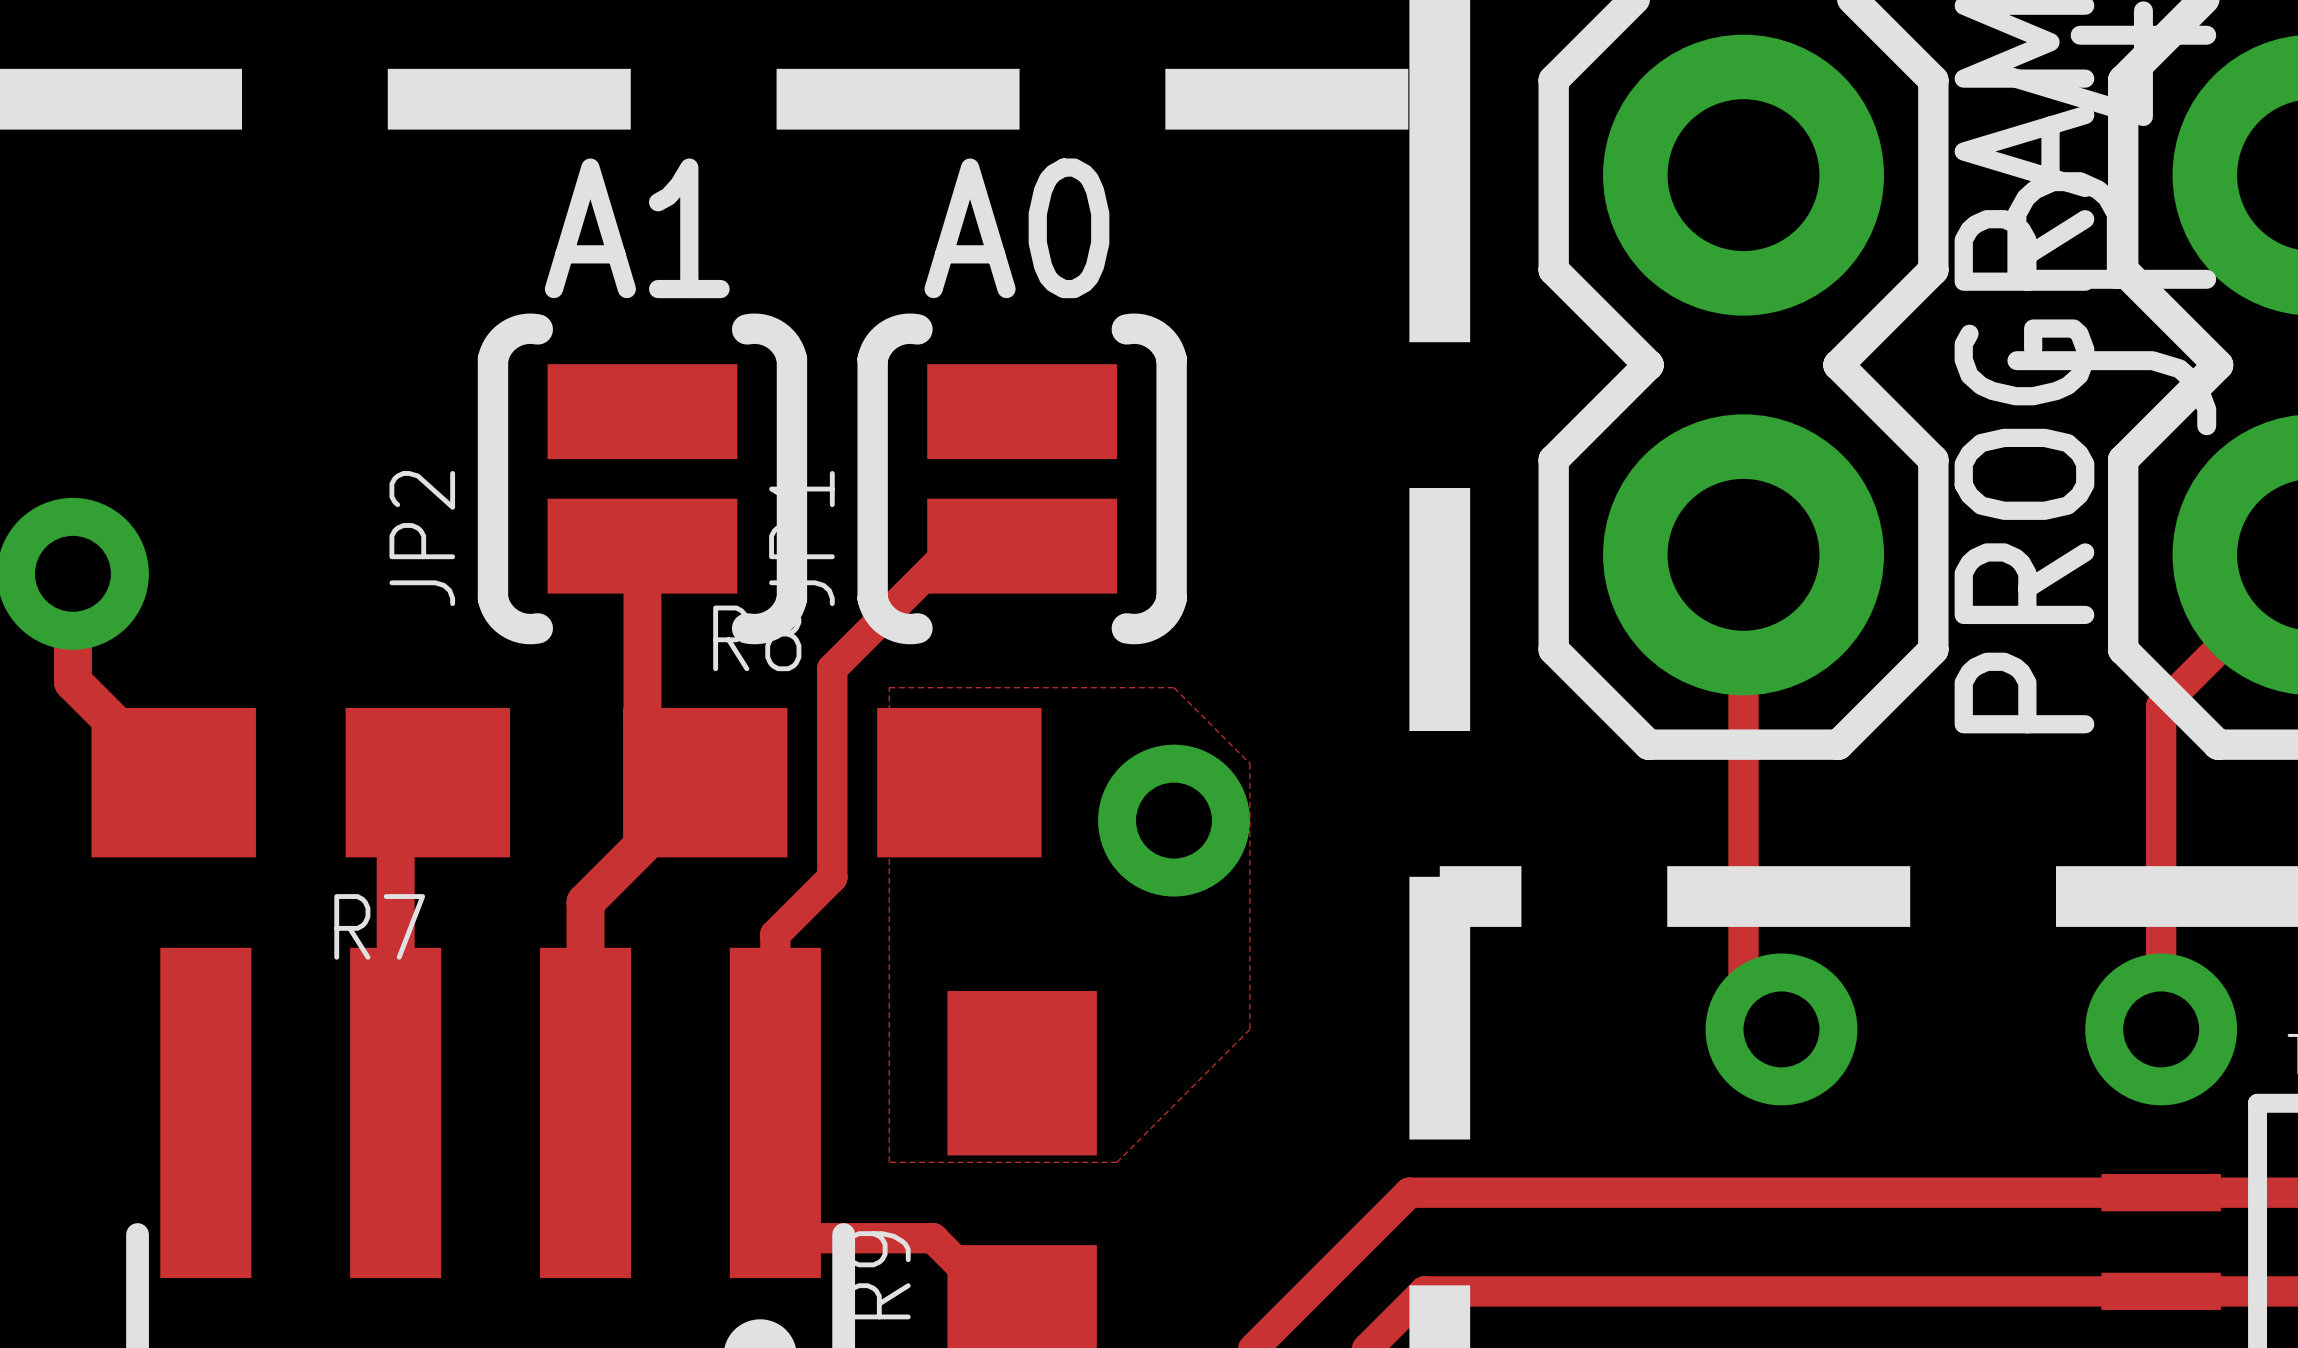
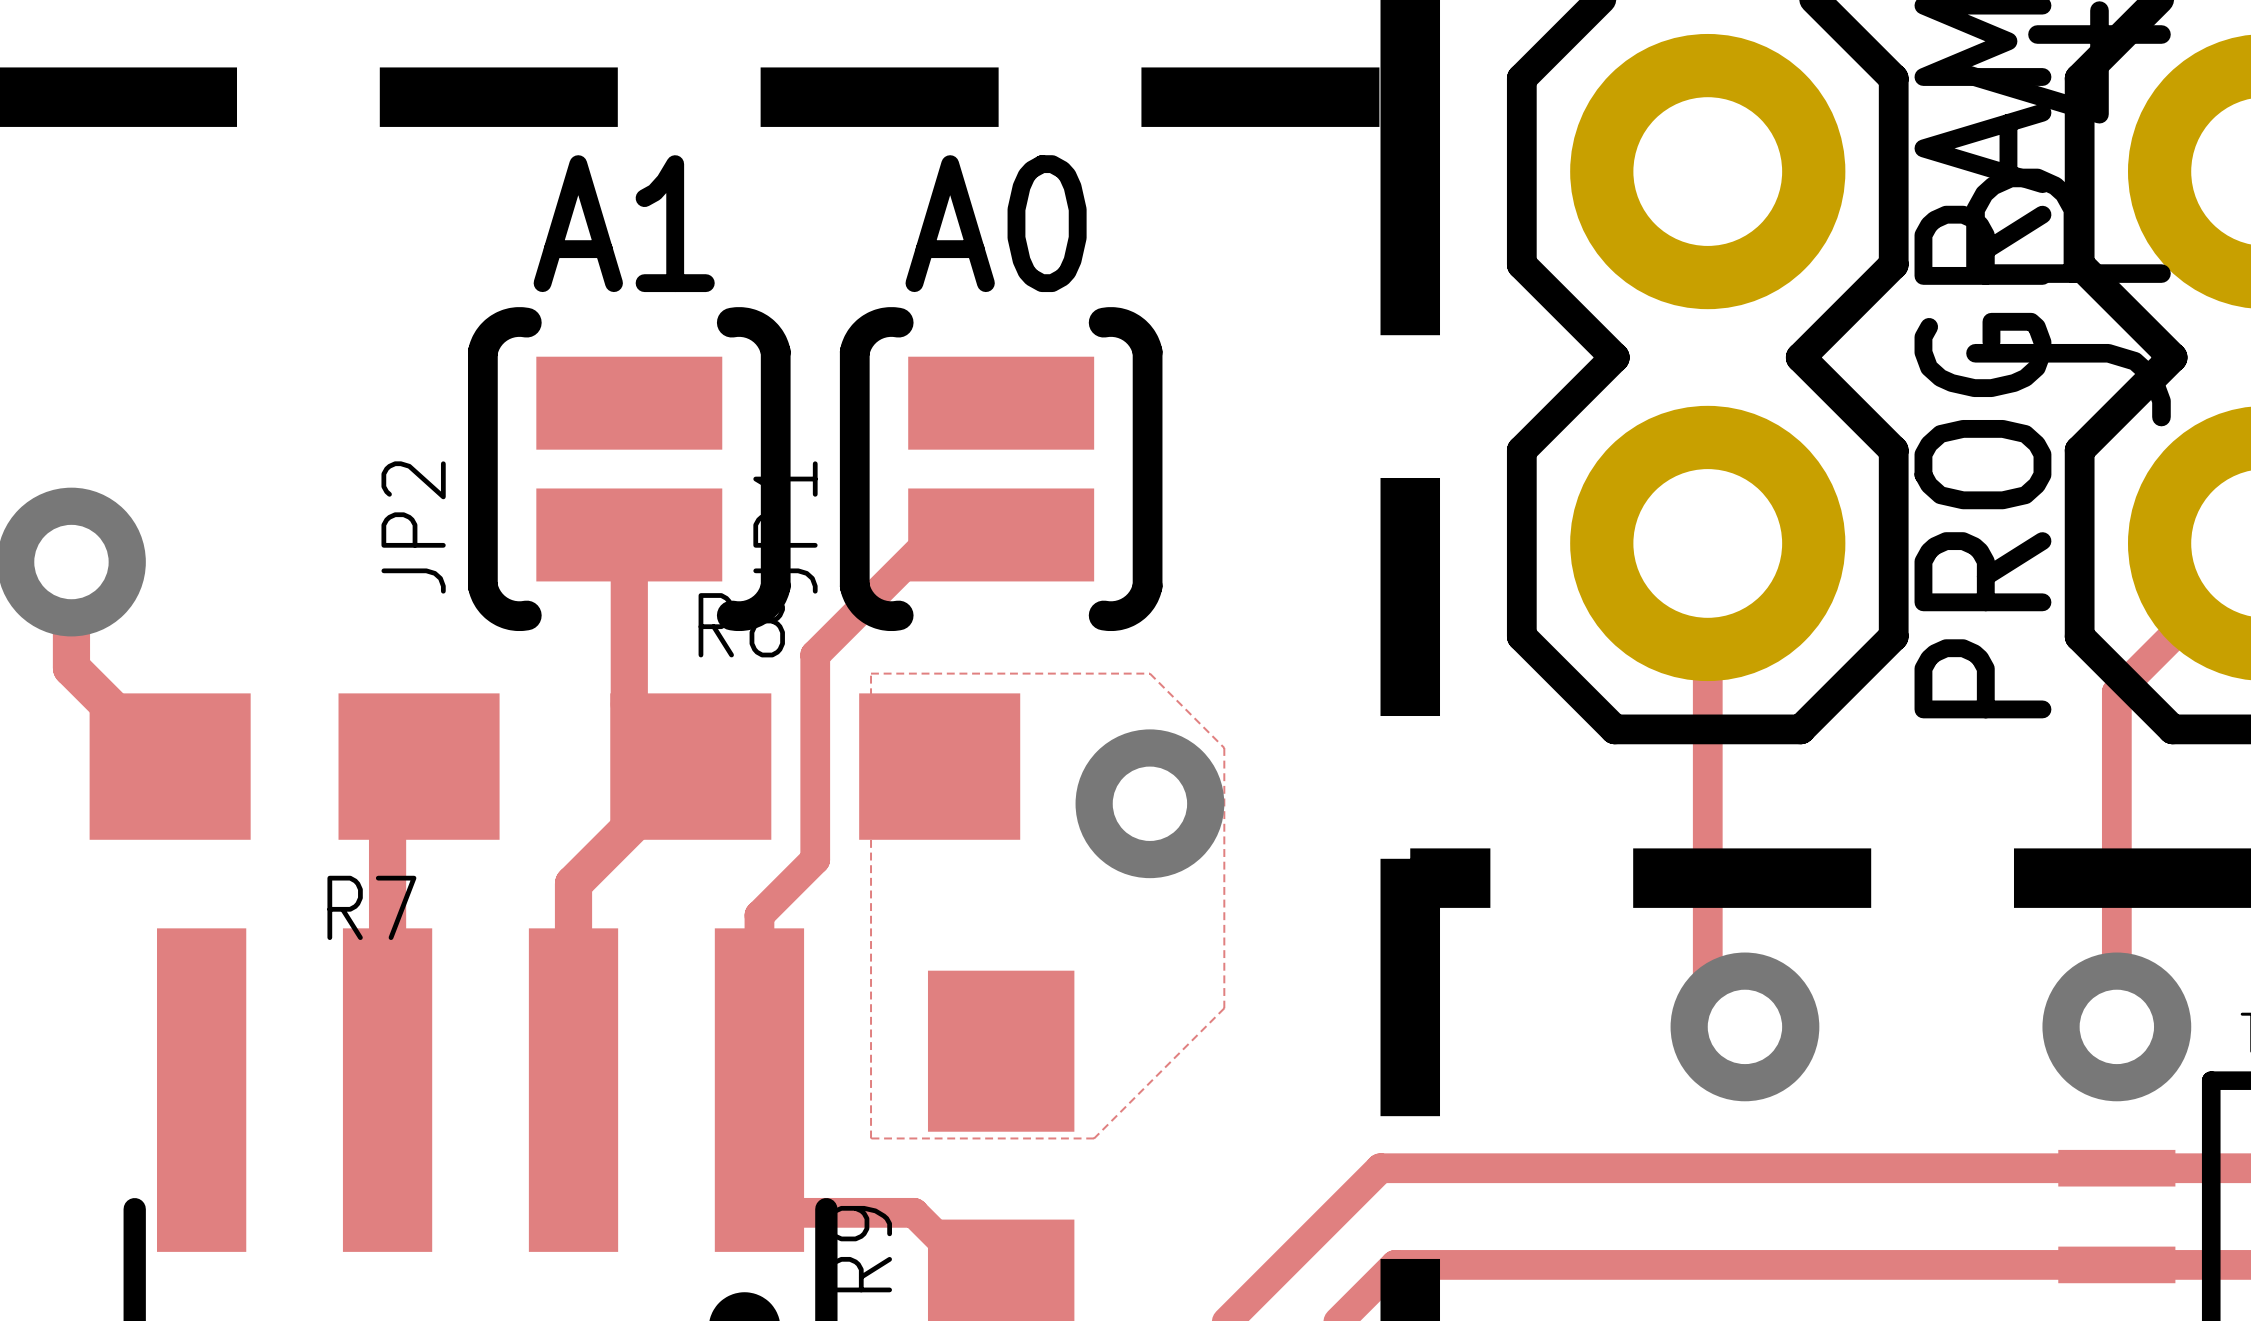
via position: (1781, 1029) -> (1744, 1026)
via position: (2161, 1029) -> (2116, 1026)

